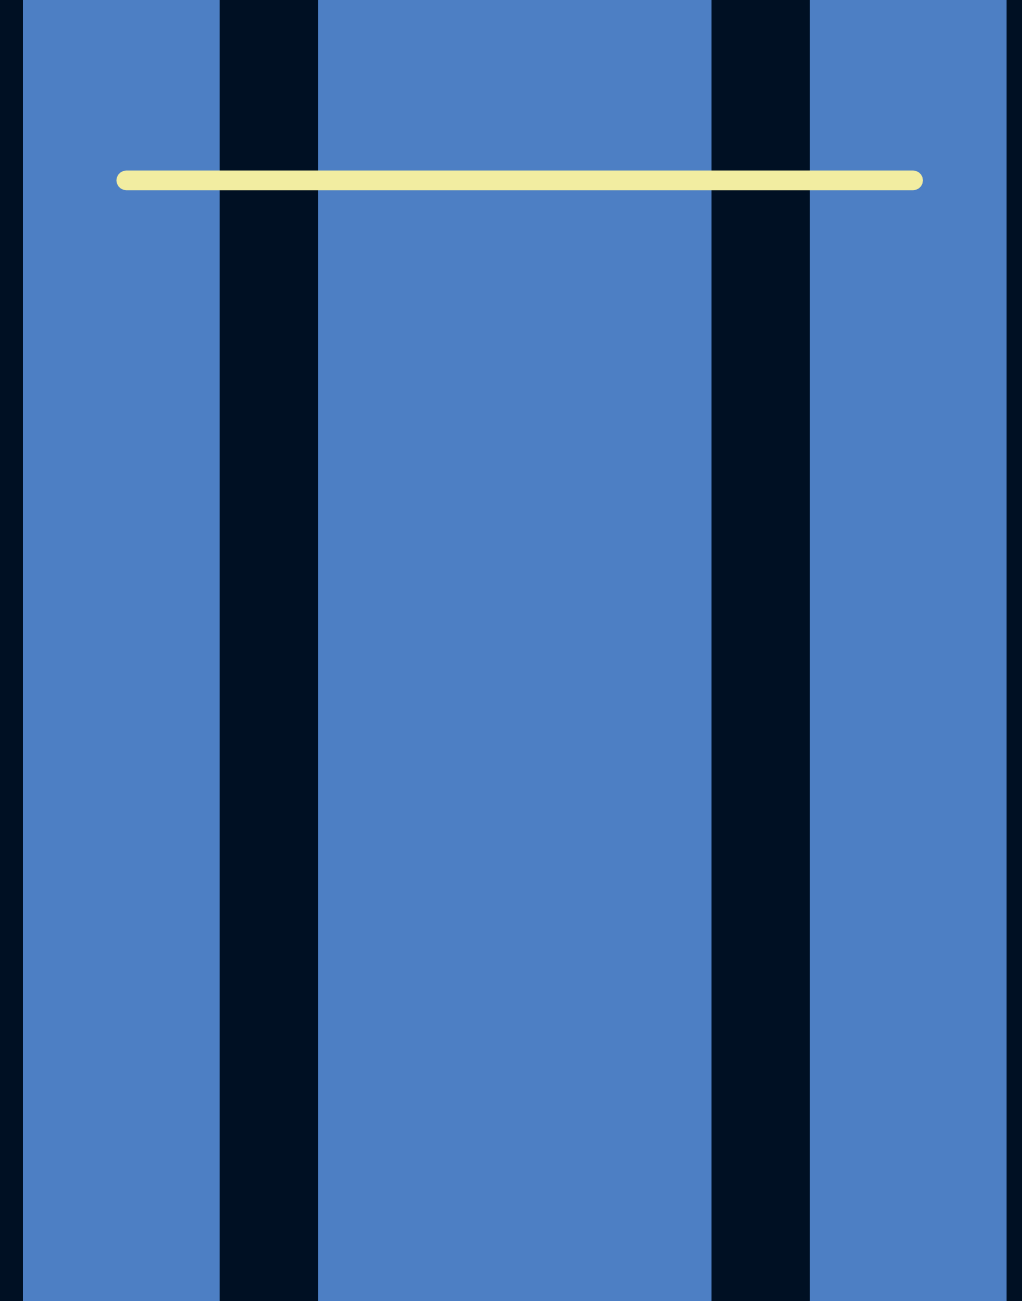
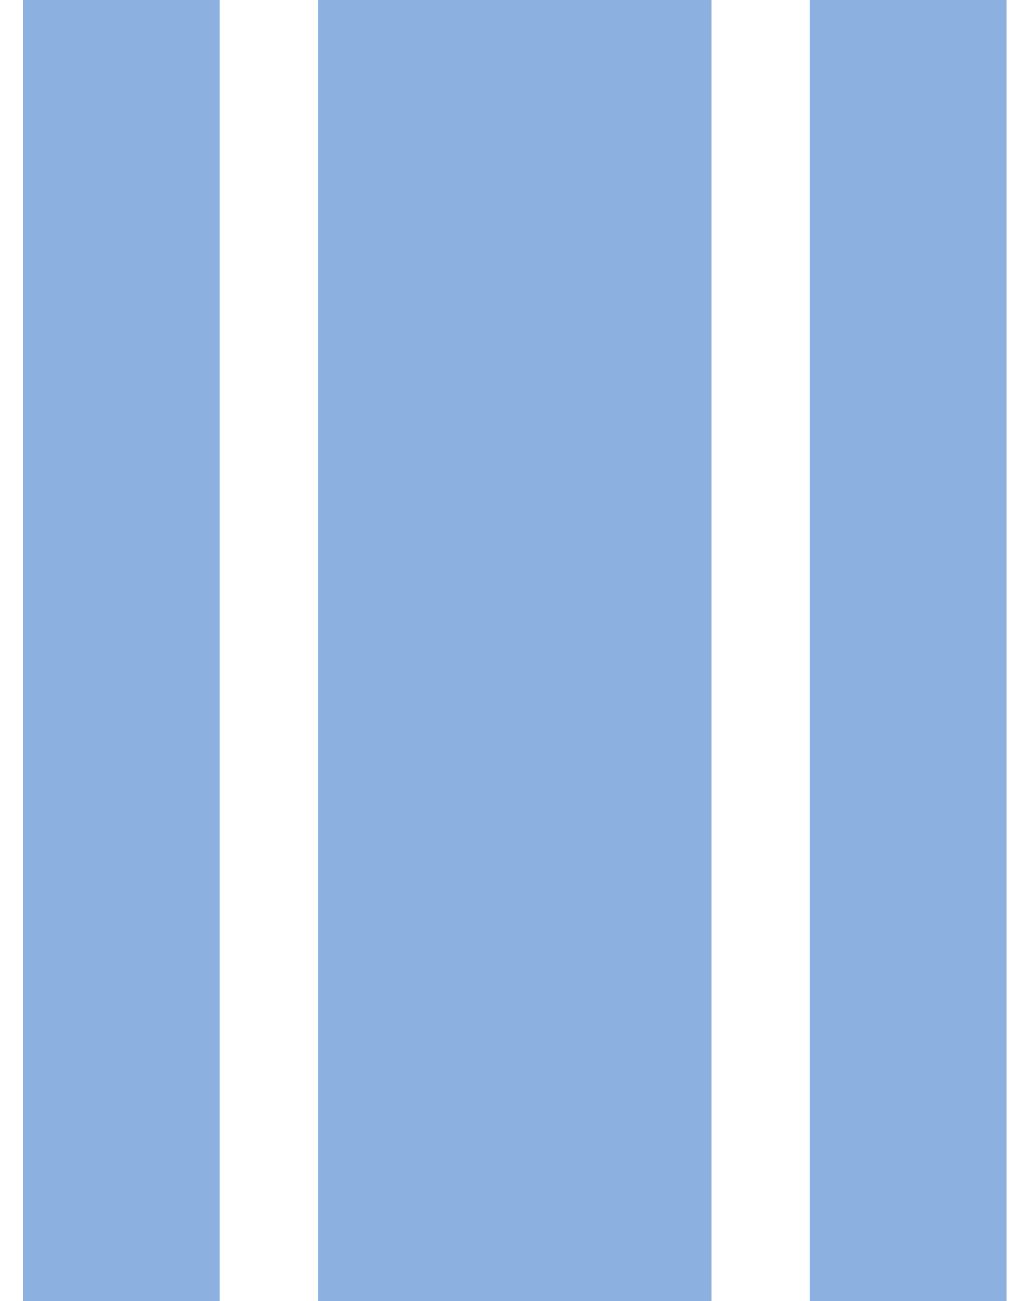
line: (913, 180) (126, 180) -> none

